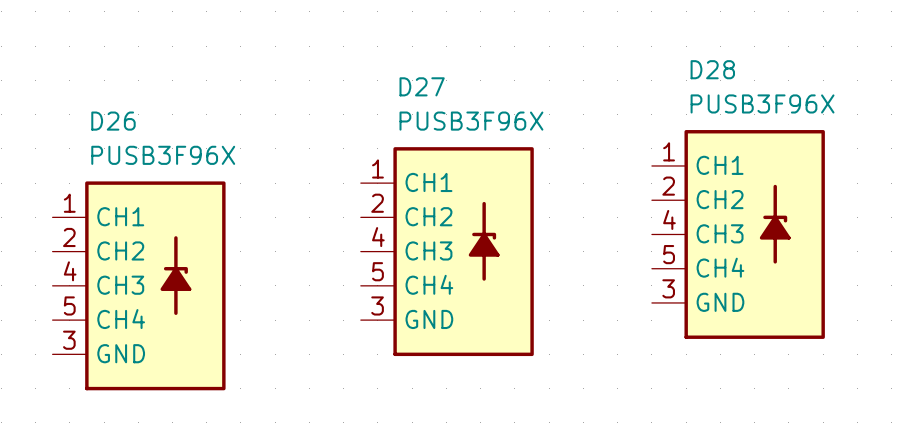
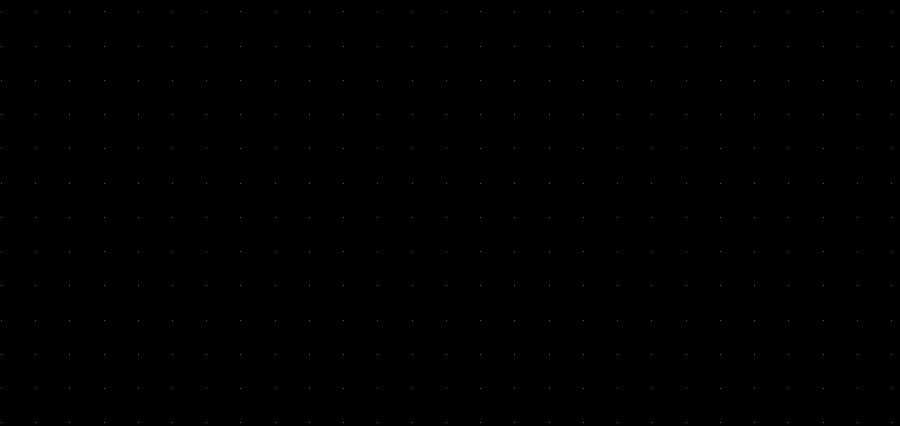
D28: (738, 234) -> none
D27: (447, 251) -> none
D26: (139, 285) -> none

